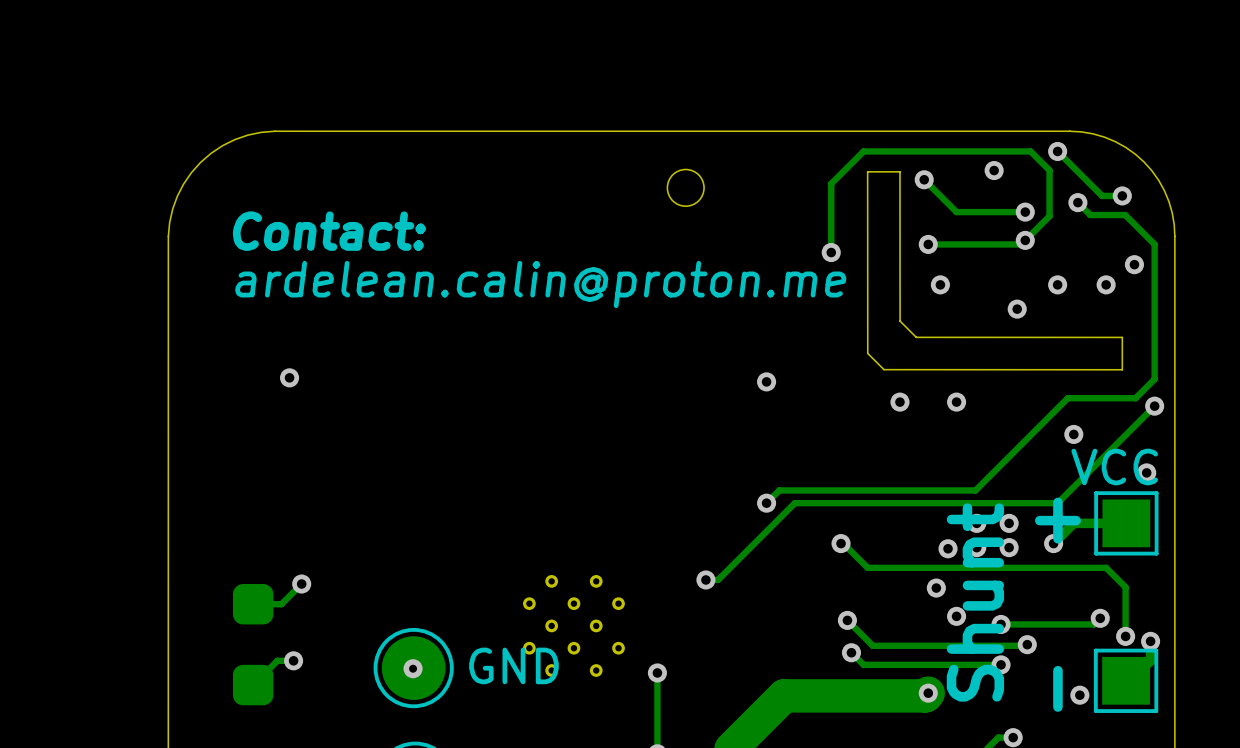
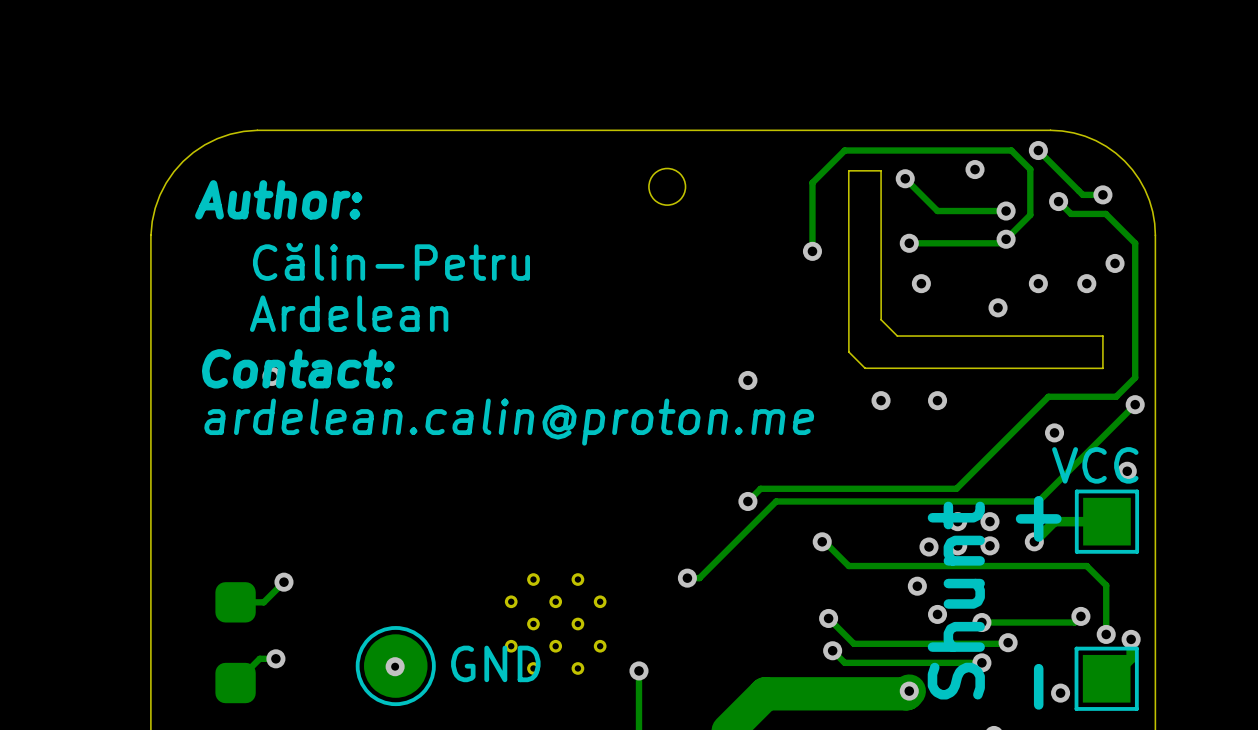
text: none -> Author: (278, 199)
text position: Contact: (329, 231) -> Contact: (298, 368)
text: none -> Călin-Petru (391, 261)
text position: ardelean.calin@proton.me (540, 284) -> ardelean.calin@proton.me (509, 422)
text: none -> Ardelean (349, 313)

